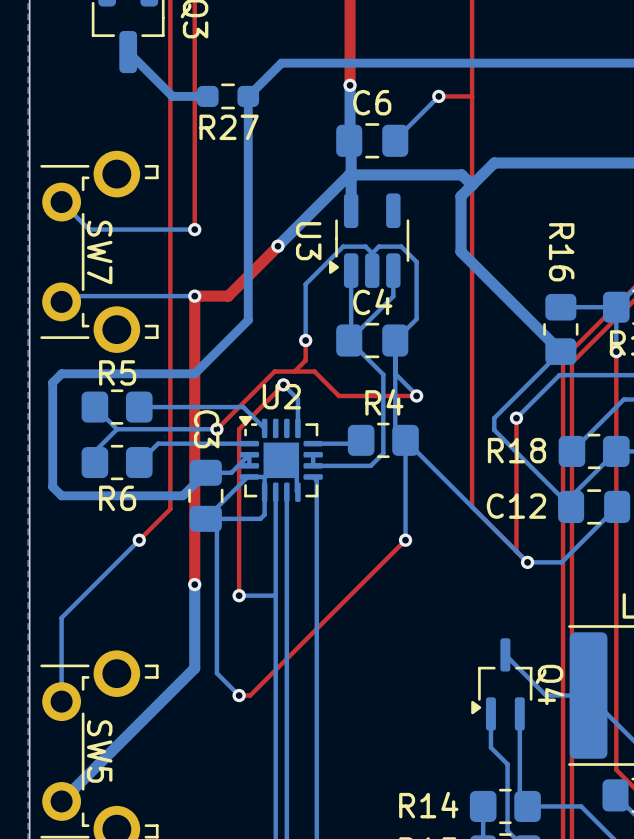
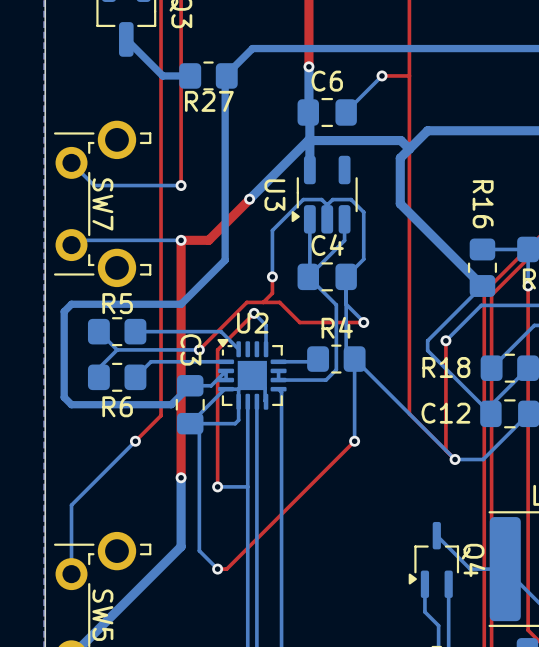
R27 footprint: [196, 83, 260, 110] -> [179, 61, 238, 91]

